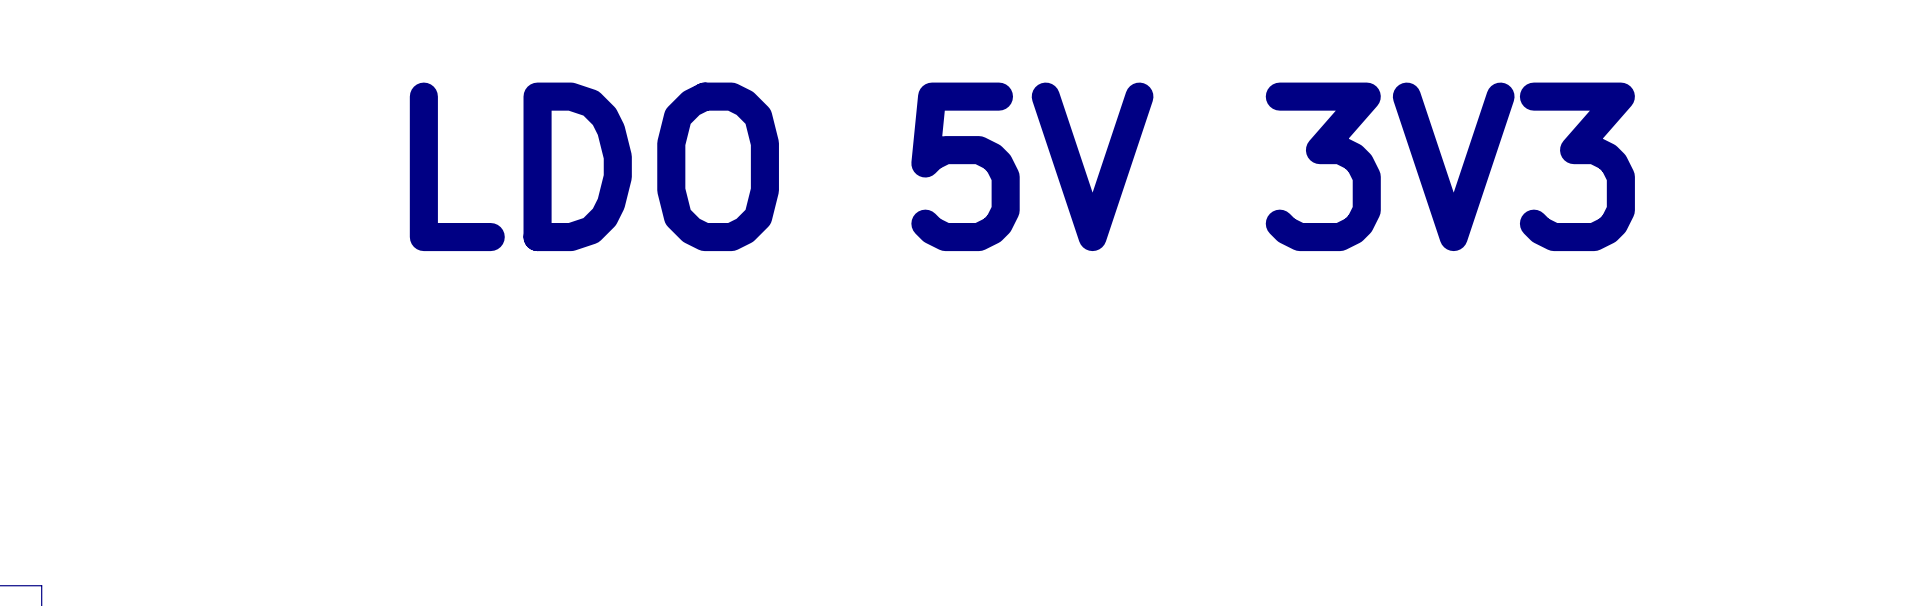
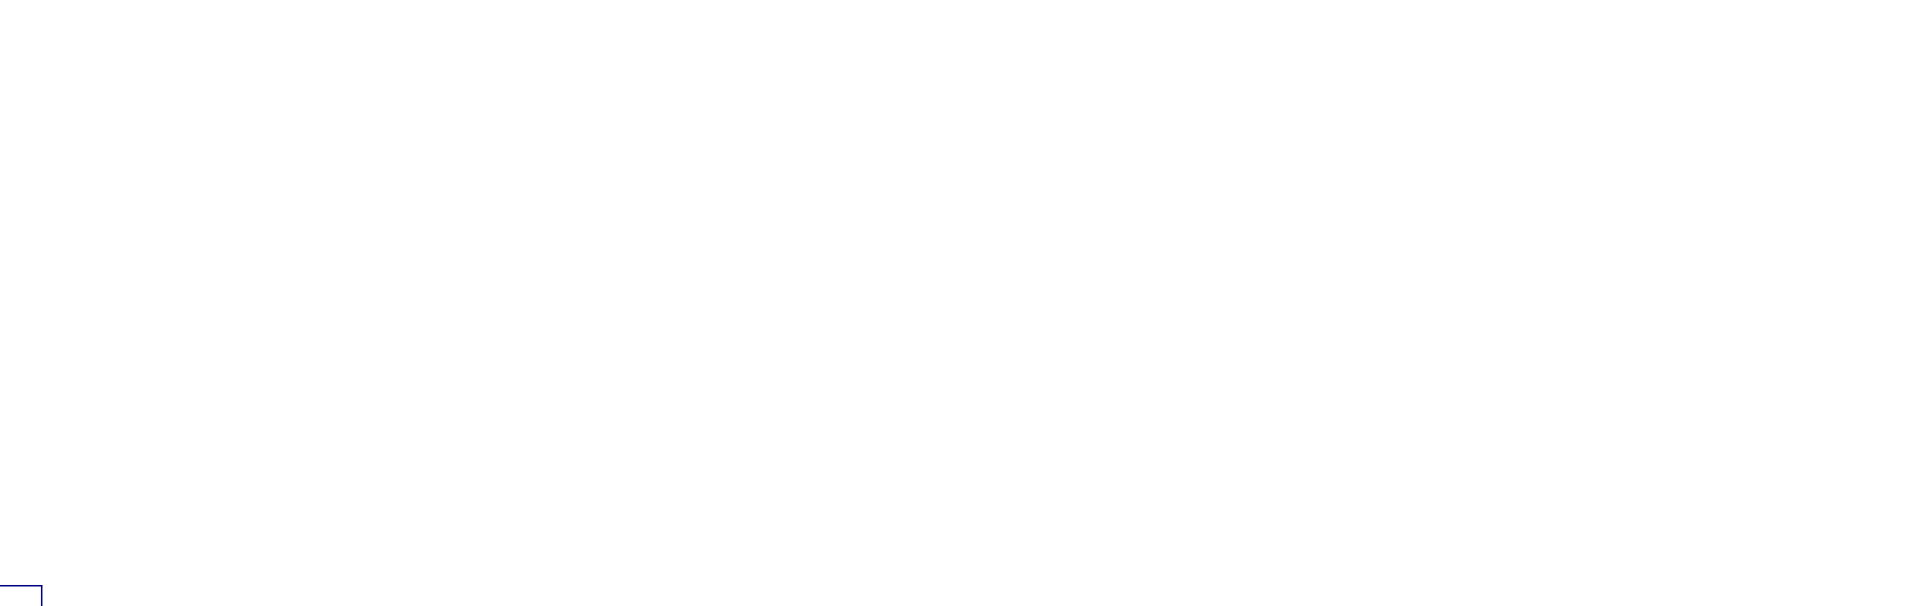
text: LDO 5V 3V3 (1022, 166) -> none

